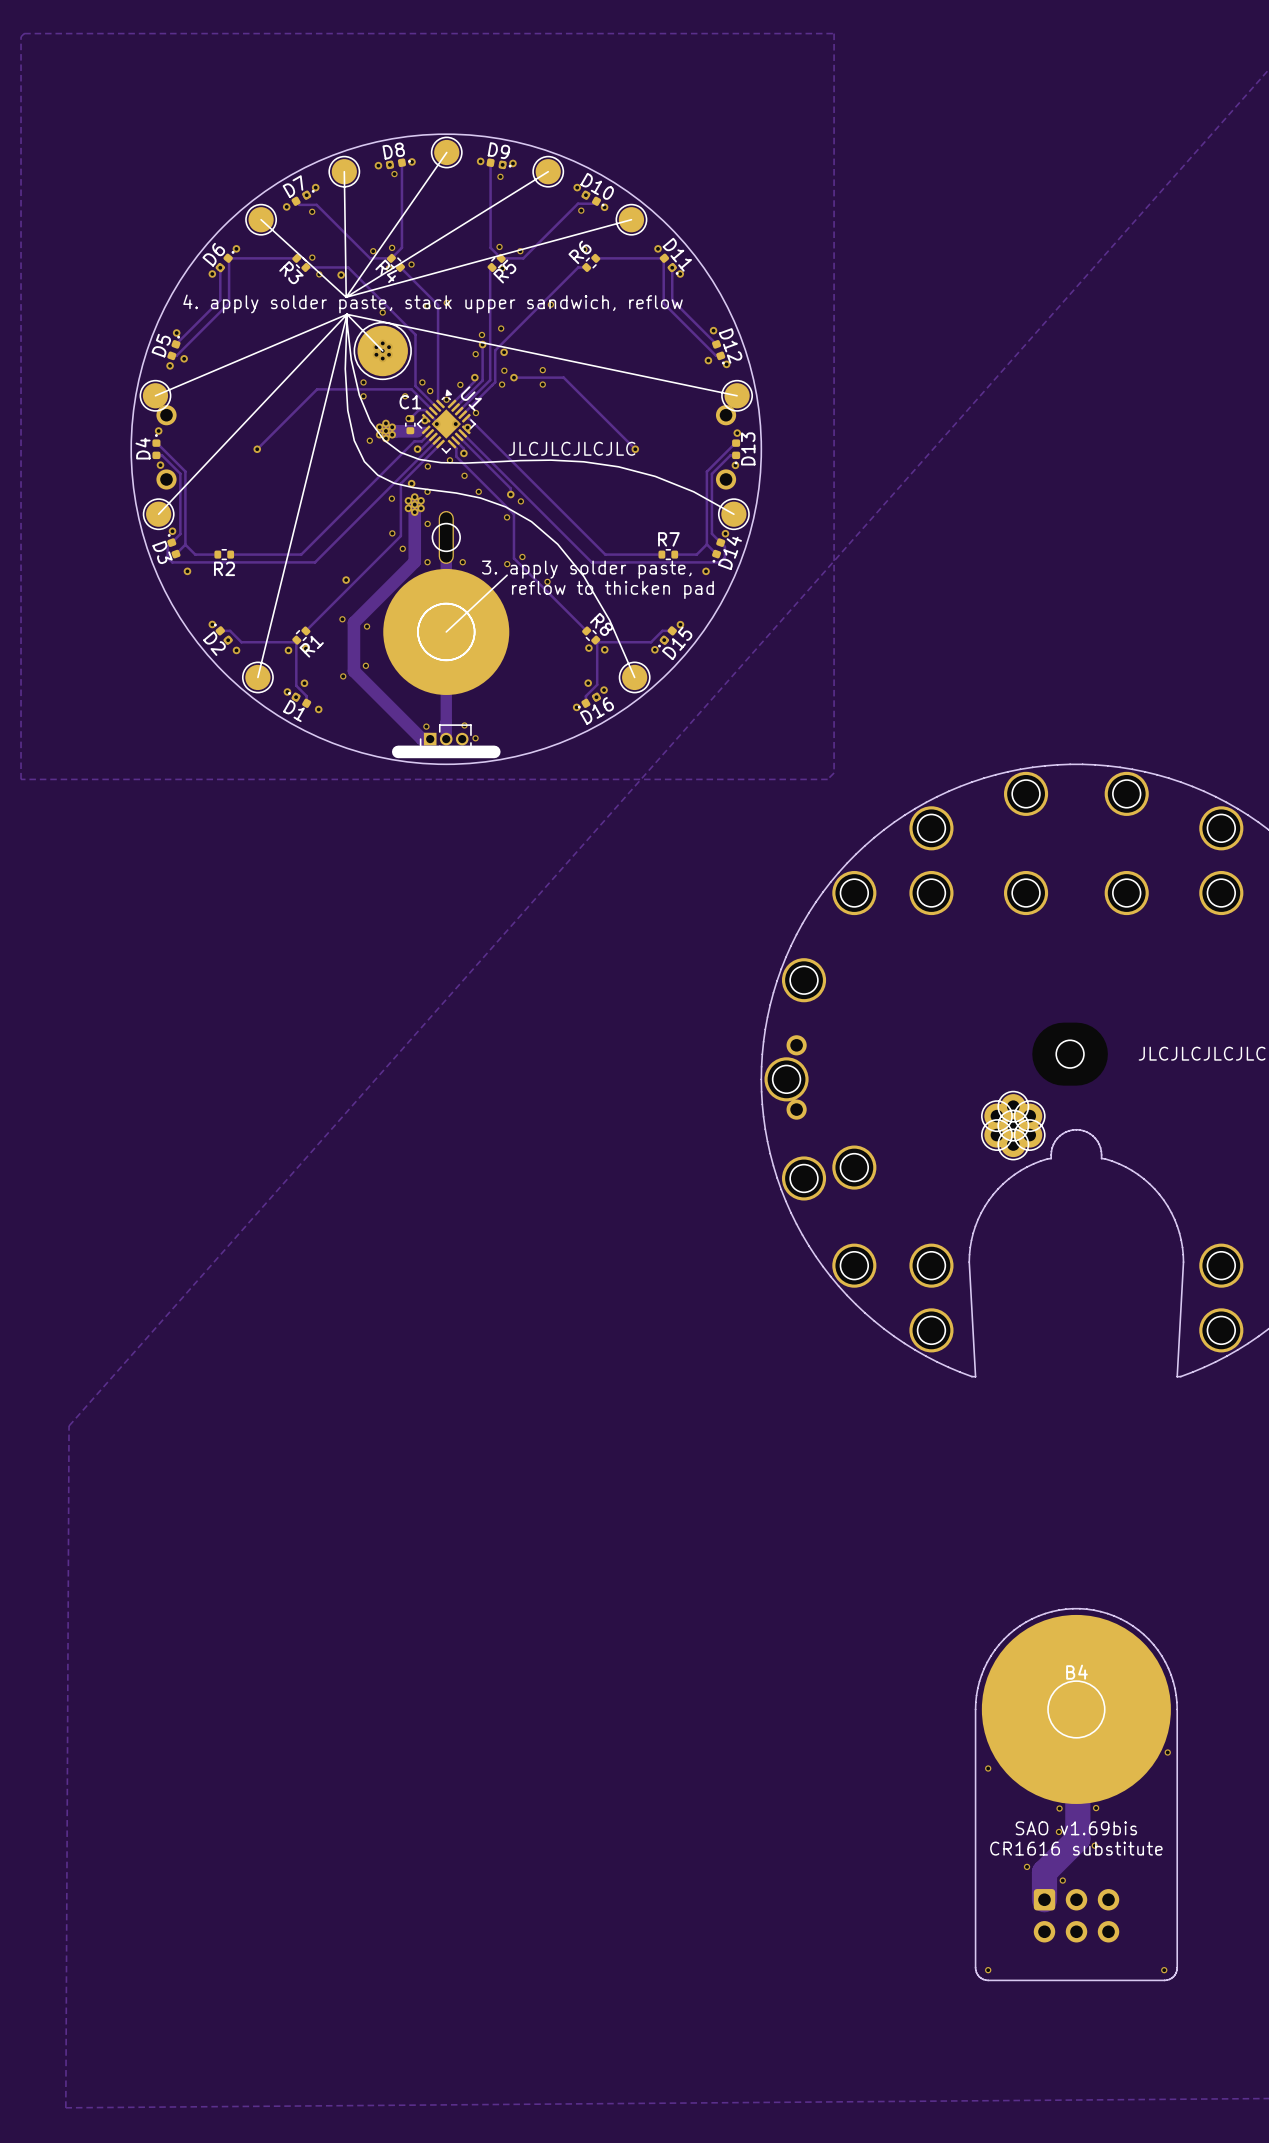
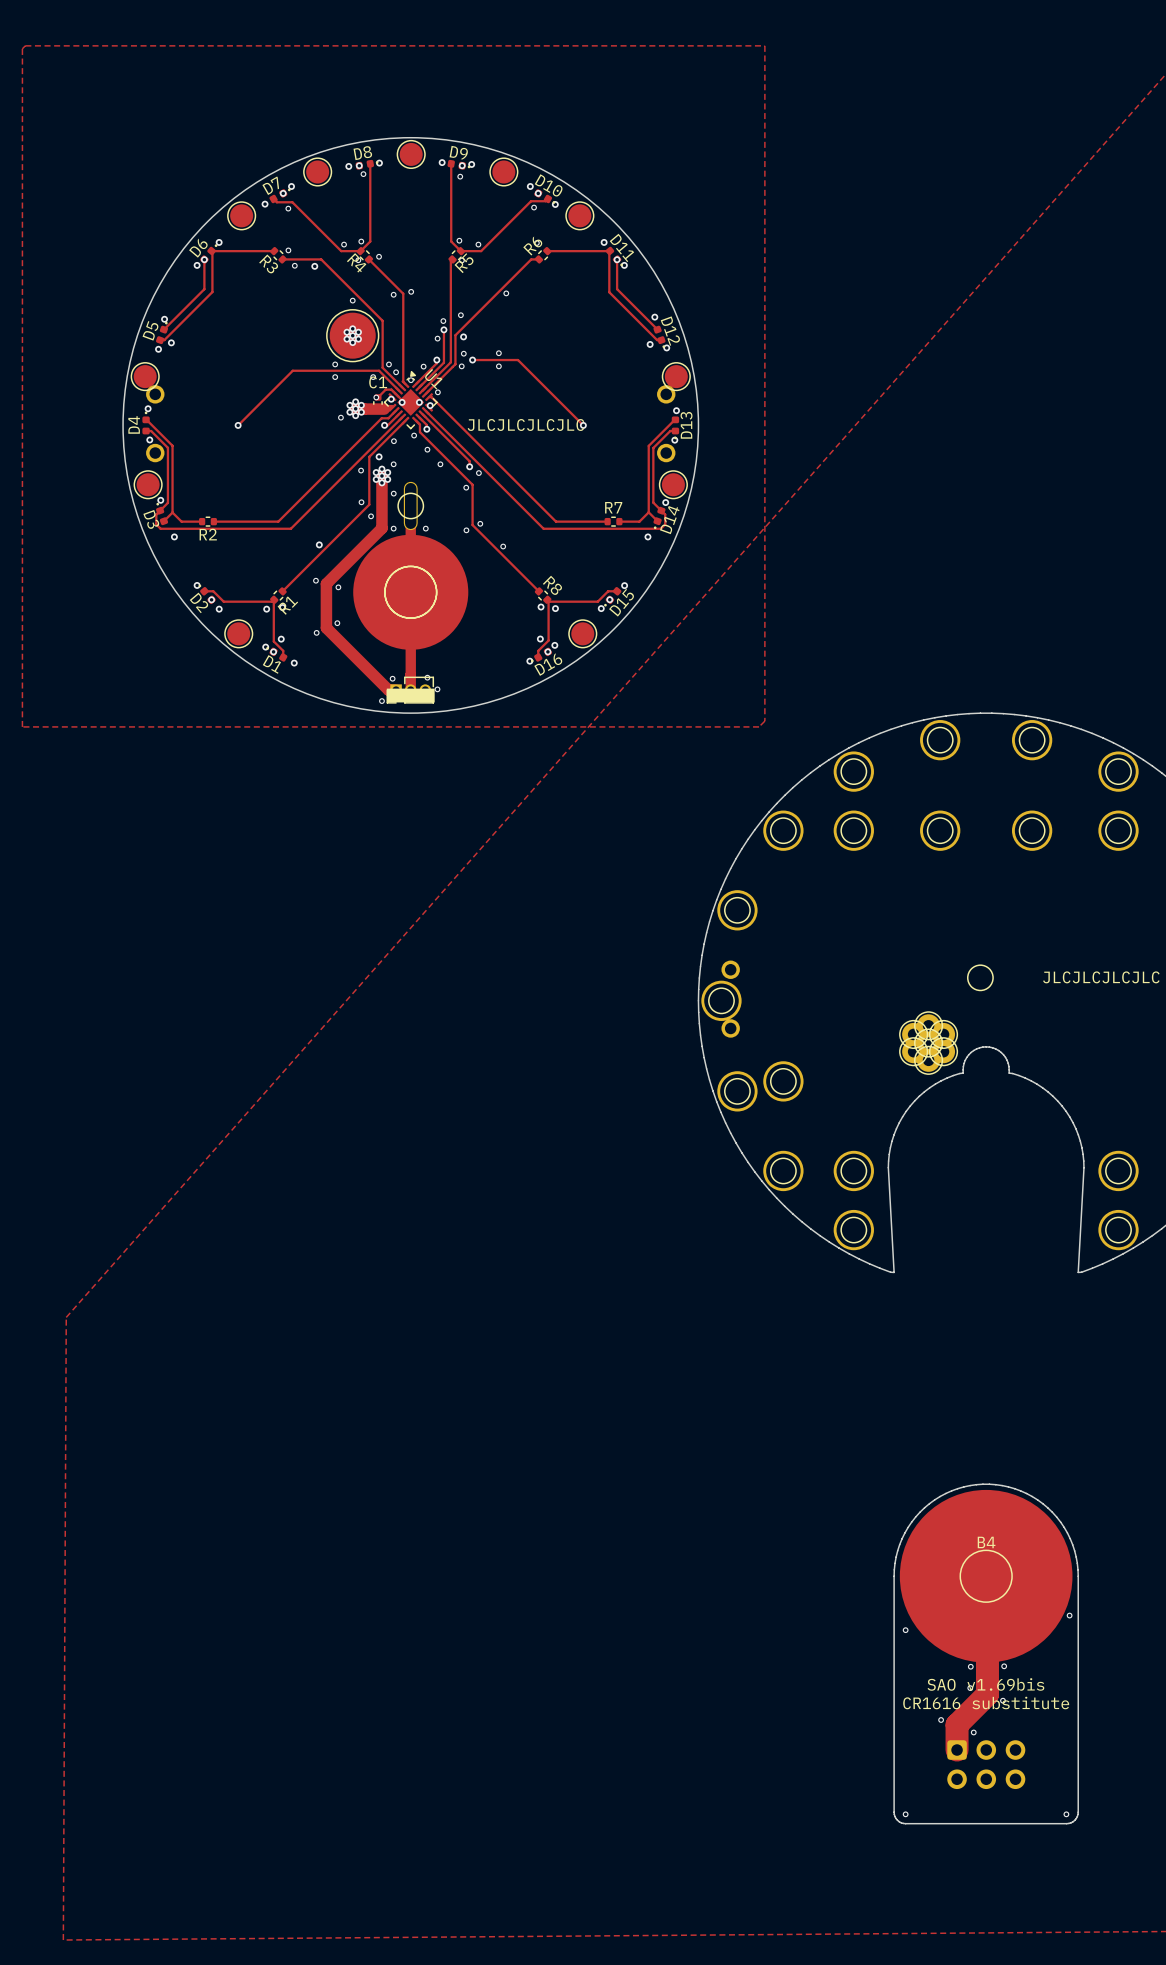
line: (446, 152) (346, 297) -> none
line: (344, 171) (346, 297) -> none
line: (548, 171) (346, 297) -> none
line: (261, 219) (346, 297) -> none
line: (631, 219) (346, 297) -> none
text: 4. apply solder paste, stack upper sandwich, reflow (433, 303) -> none
line: (346, 314) (351, 360) (359, 395) (370, 421) (384, 440) (400, 452) (419, 459) (441, 462) (551, 460) (583, 461) (618, 466) (655, 476) (693, 491) (733, 514) -> none
line: (347, 314) (382, 350) -> none
line: (347, 314) (155, 395) -> none
line: (347, 314) (257, 677) -> none
line: (347, 314) (737, 395) -> none
line: (347, 314) (158, 514) -> none
line: (347, 314) (345, 368) (347, 410) (354, 440) (364, 461) (377, 475) (393, 483) (480, 498) (505, 506) (531, 521) (557, 544) (583, 576) (609, 620) (634, 677) -> none
text: 3. apply solder paste, (586, 569) -> none
line: (507, 575) (446, 631) -> none
text: reflow to thicken pad (612, 589) -> none

